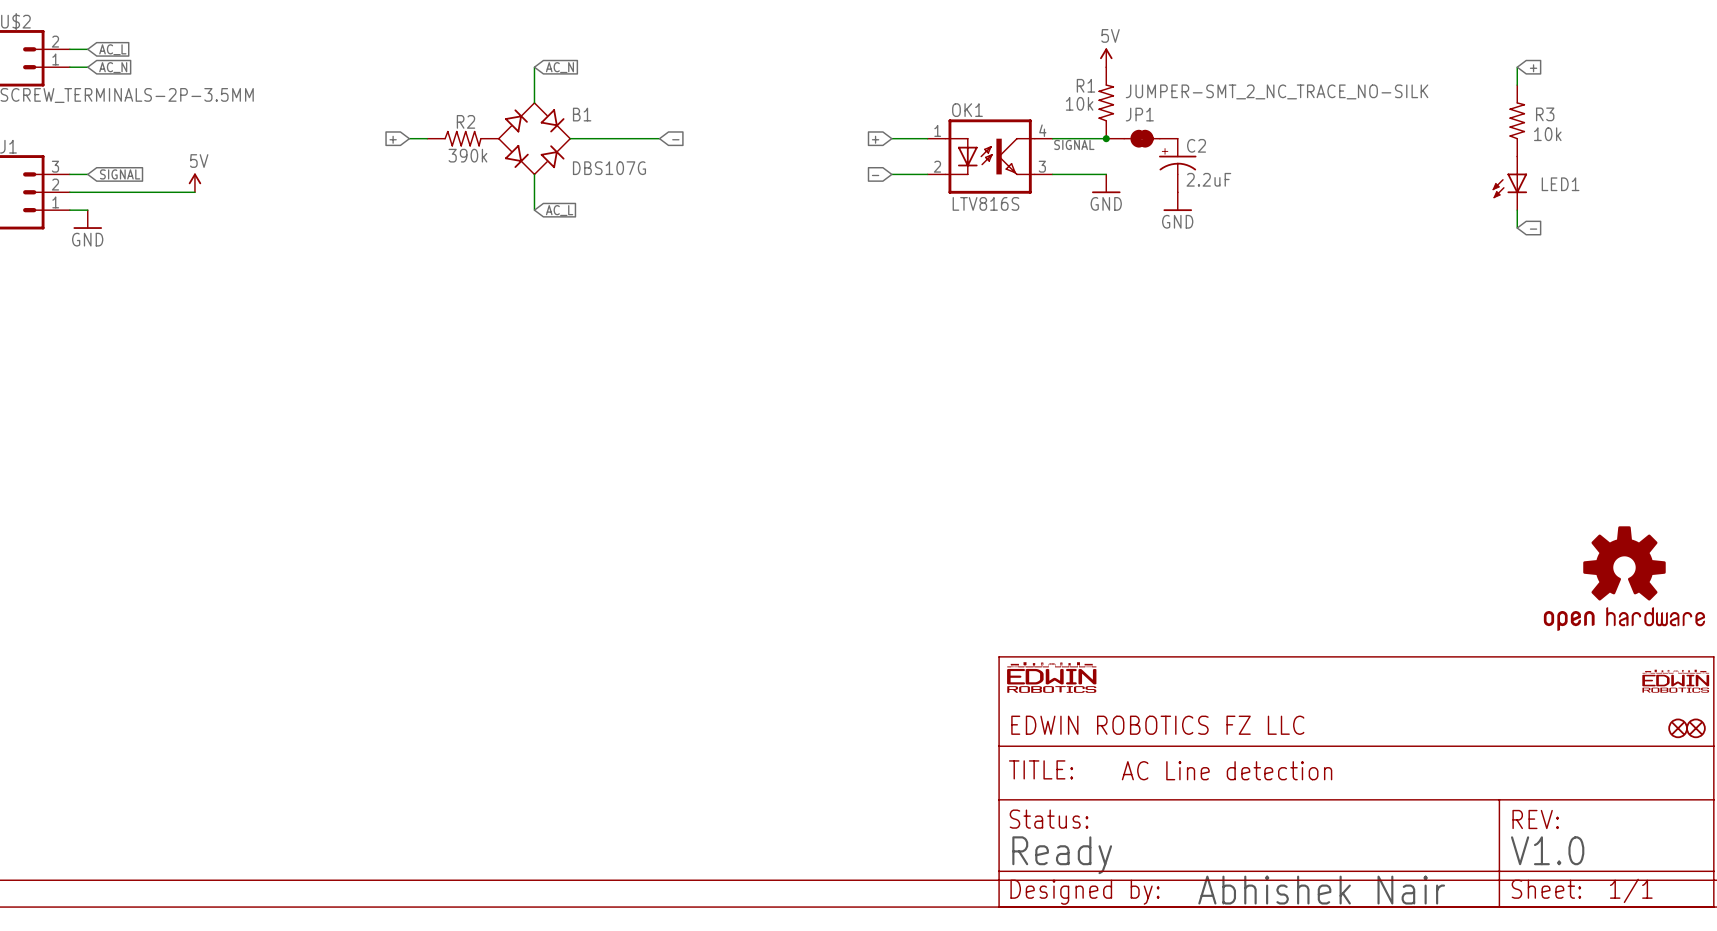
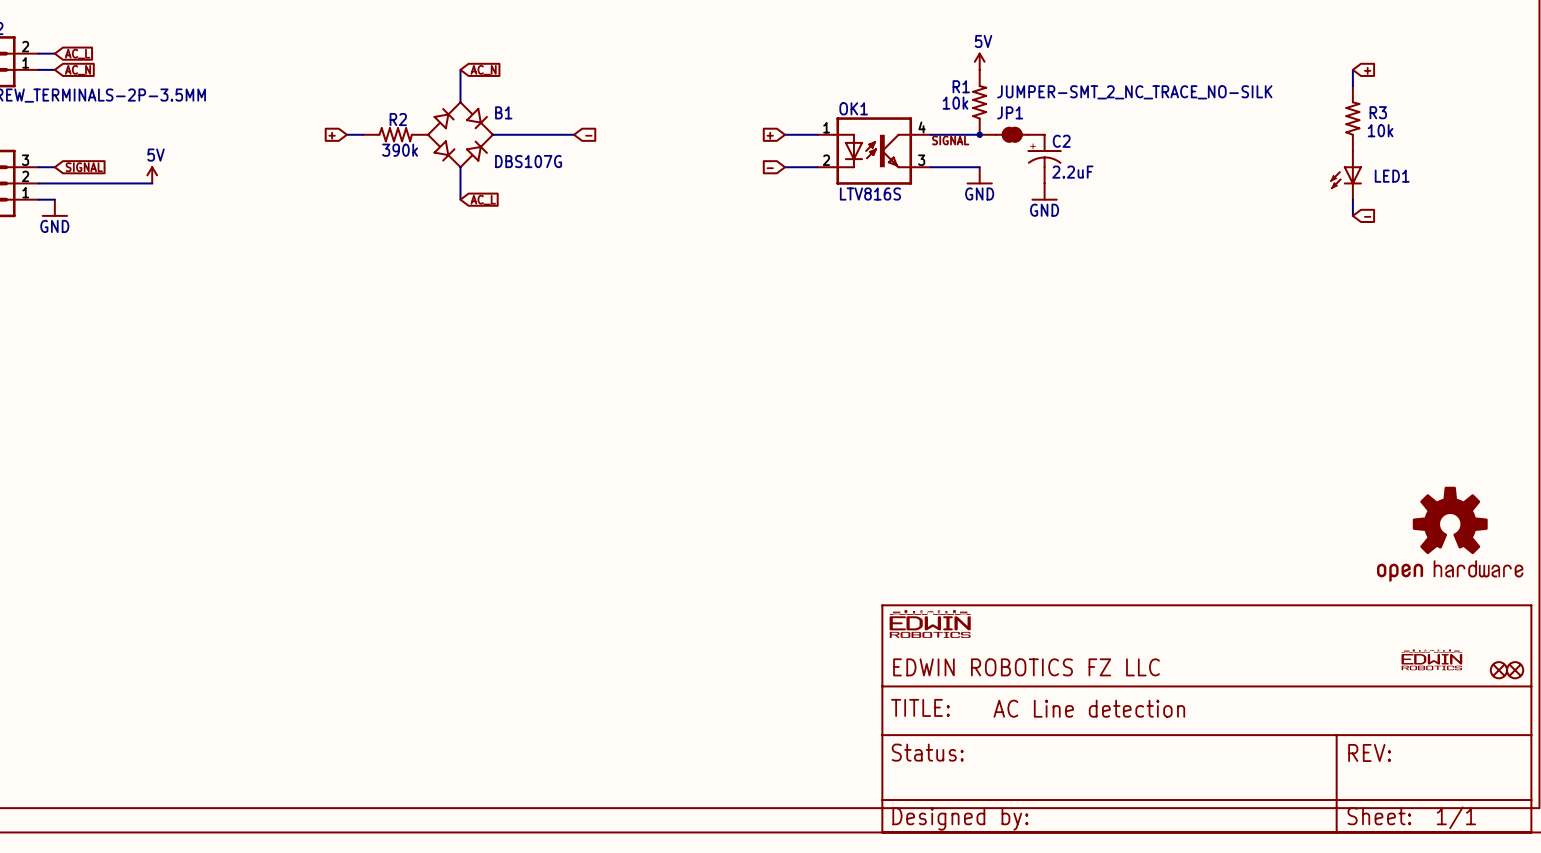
part position: (1675, 681) -> (1431, 659)
text: V1.0 (1547, 850) -> none
text: Ready (1062, 855) -> none
text: Abhishek Nair (1321, 890) -> none

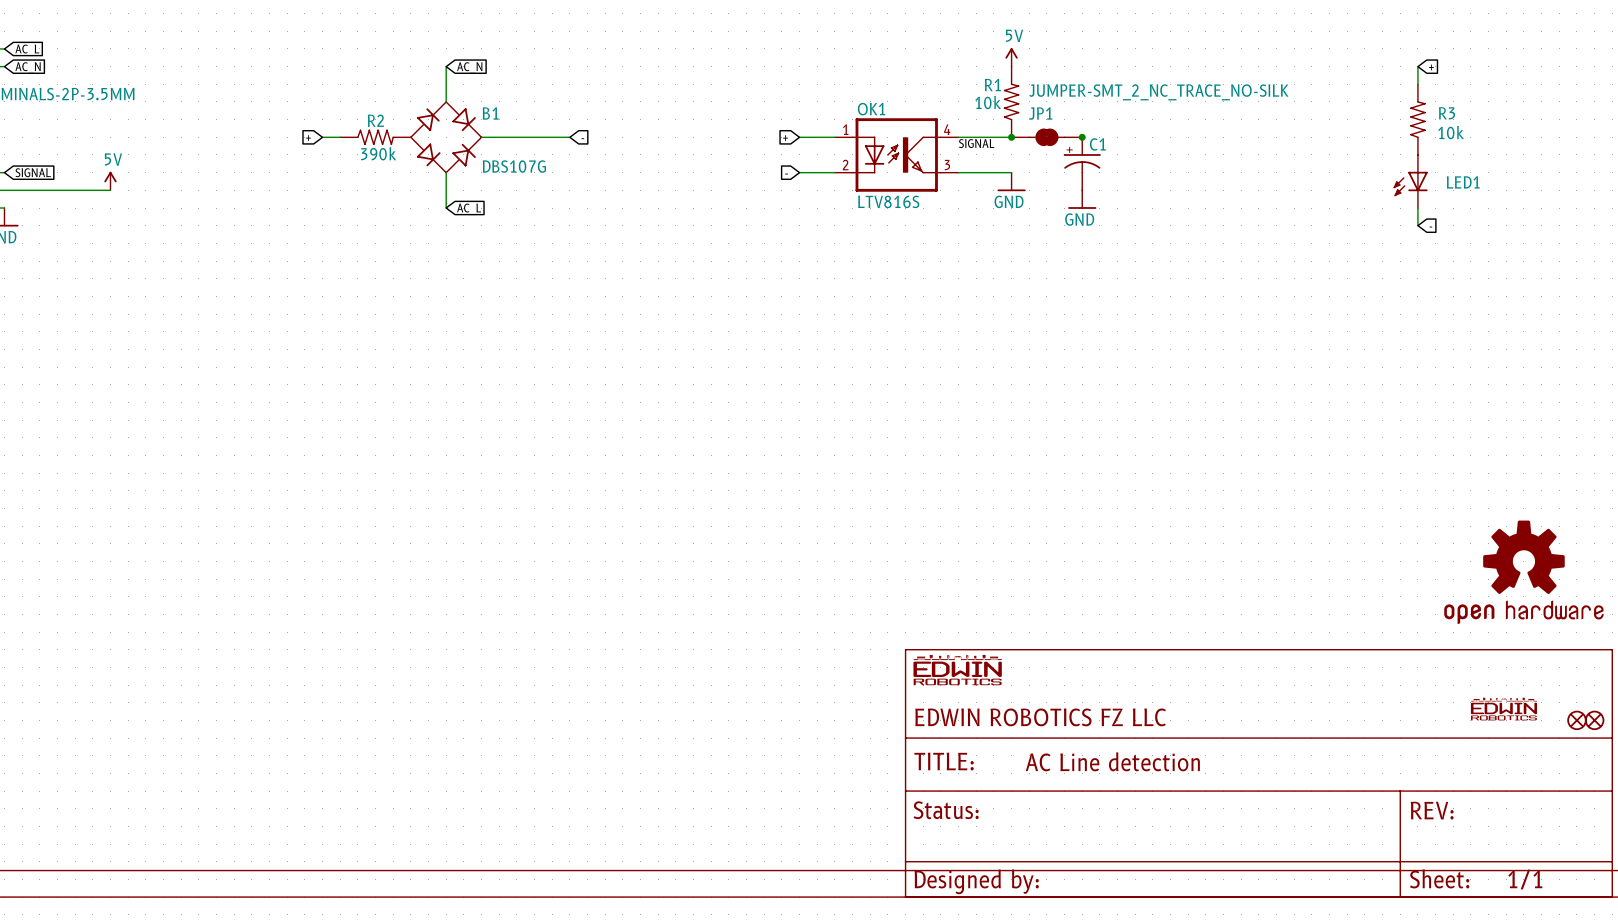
junction: none -> (1082, 137)
C2 name: C2 (1061, 141) -> C1 (1097, 144)
C2 value: 2.2uF (1072, 172) -> none

